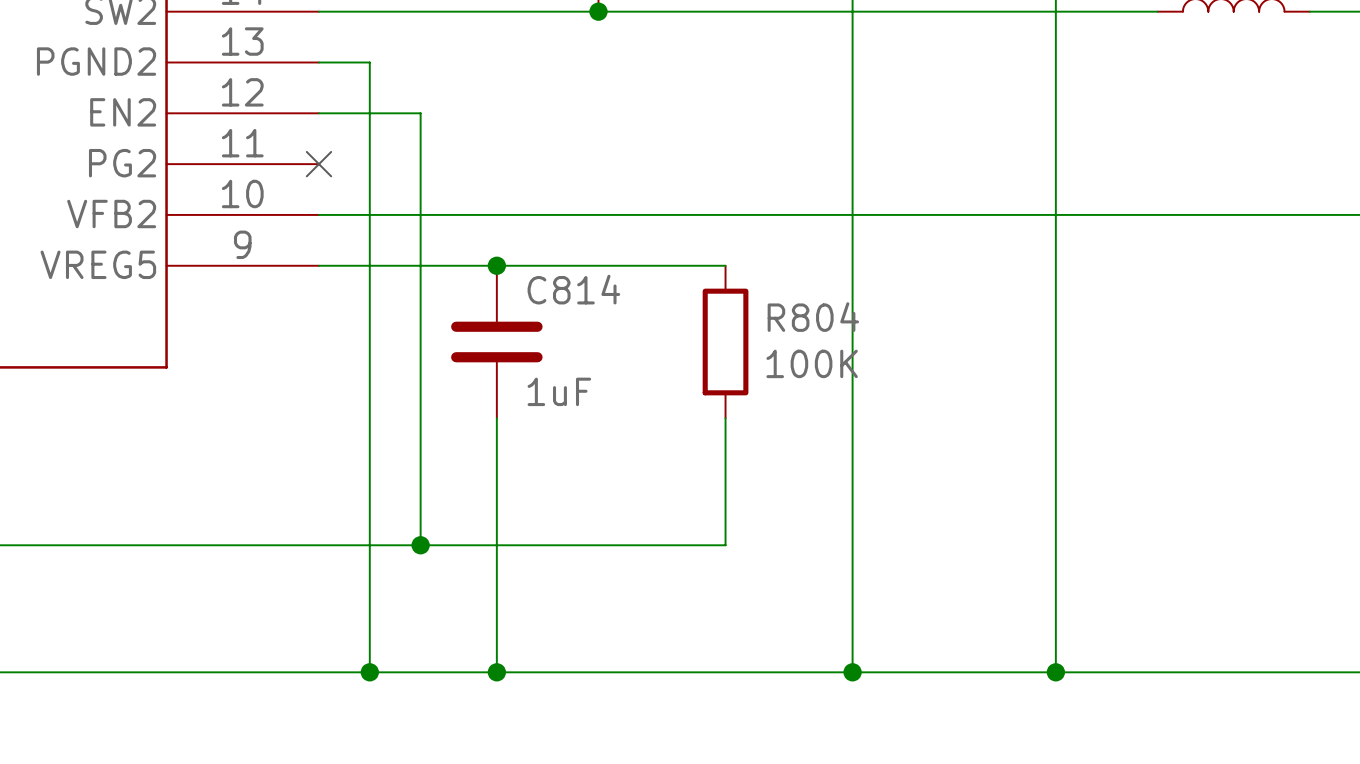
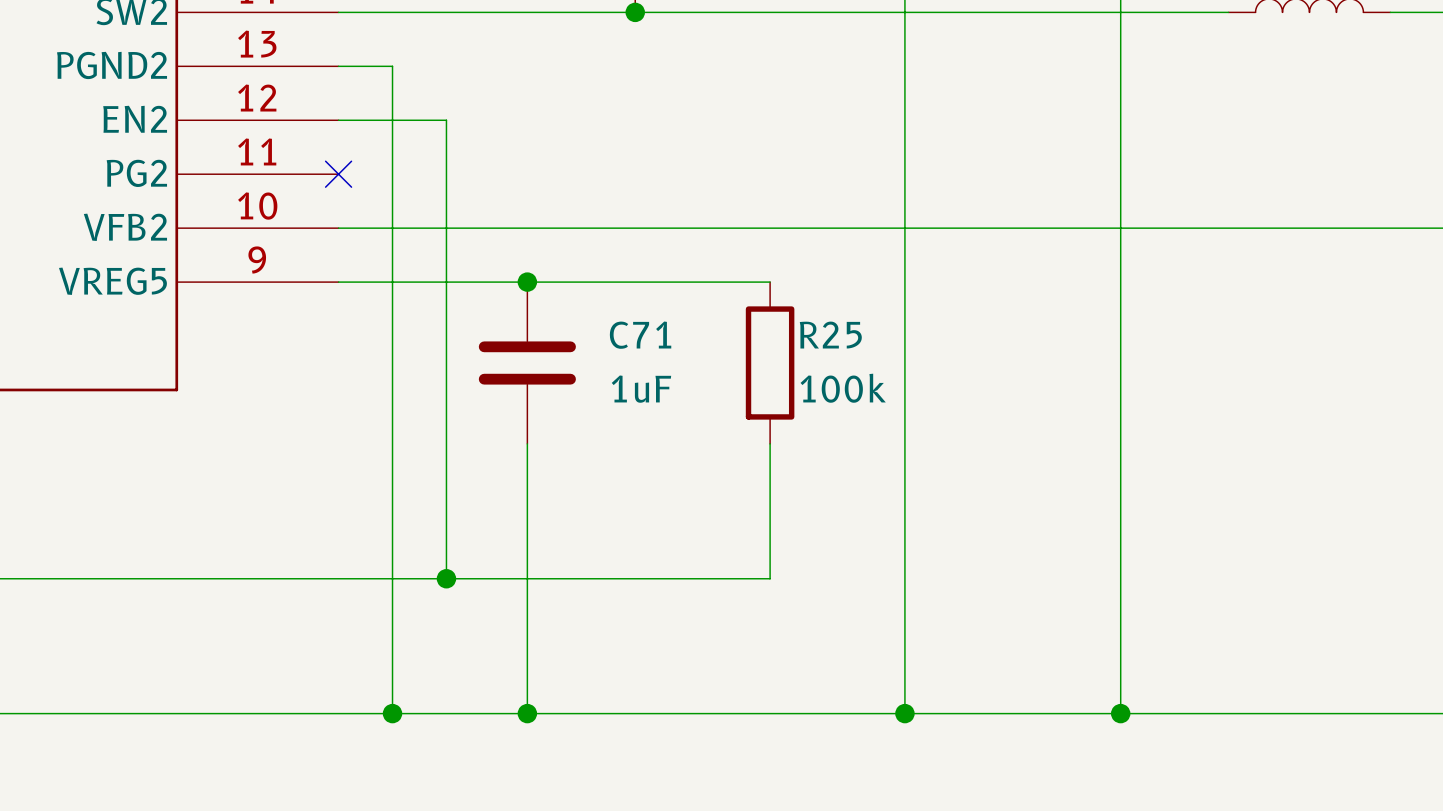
C814 name: C814 (573, 289) -> C71 (640, 335)
R804 name: R804 (813, 317) -> R25 (830, 335)
R804 value: 100K (812, 363) -> 100k (843, 388)
C814 value position: 1uF (559, 391) -> 1uF (641, 389)

